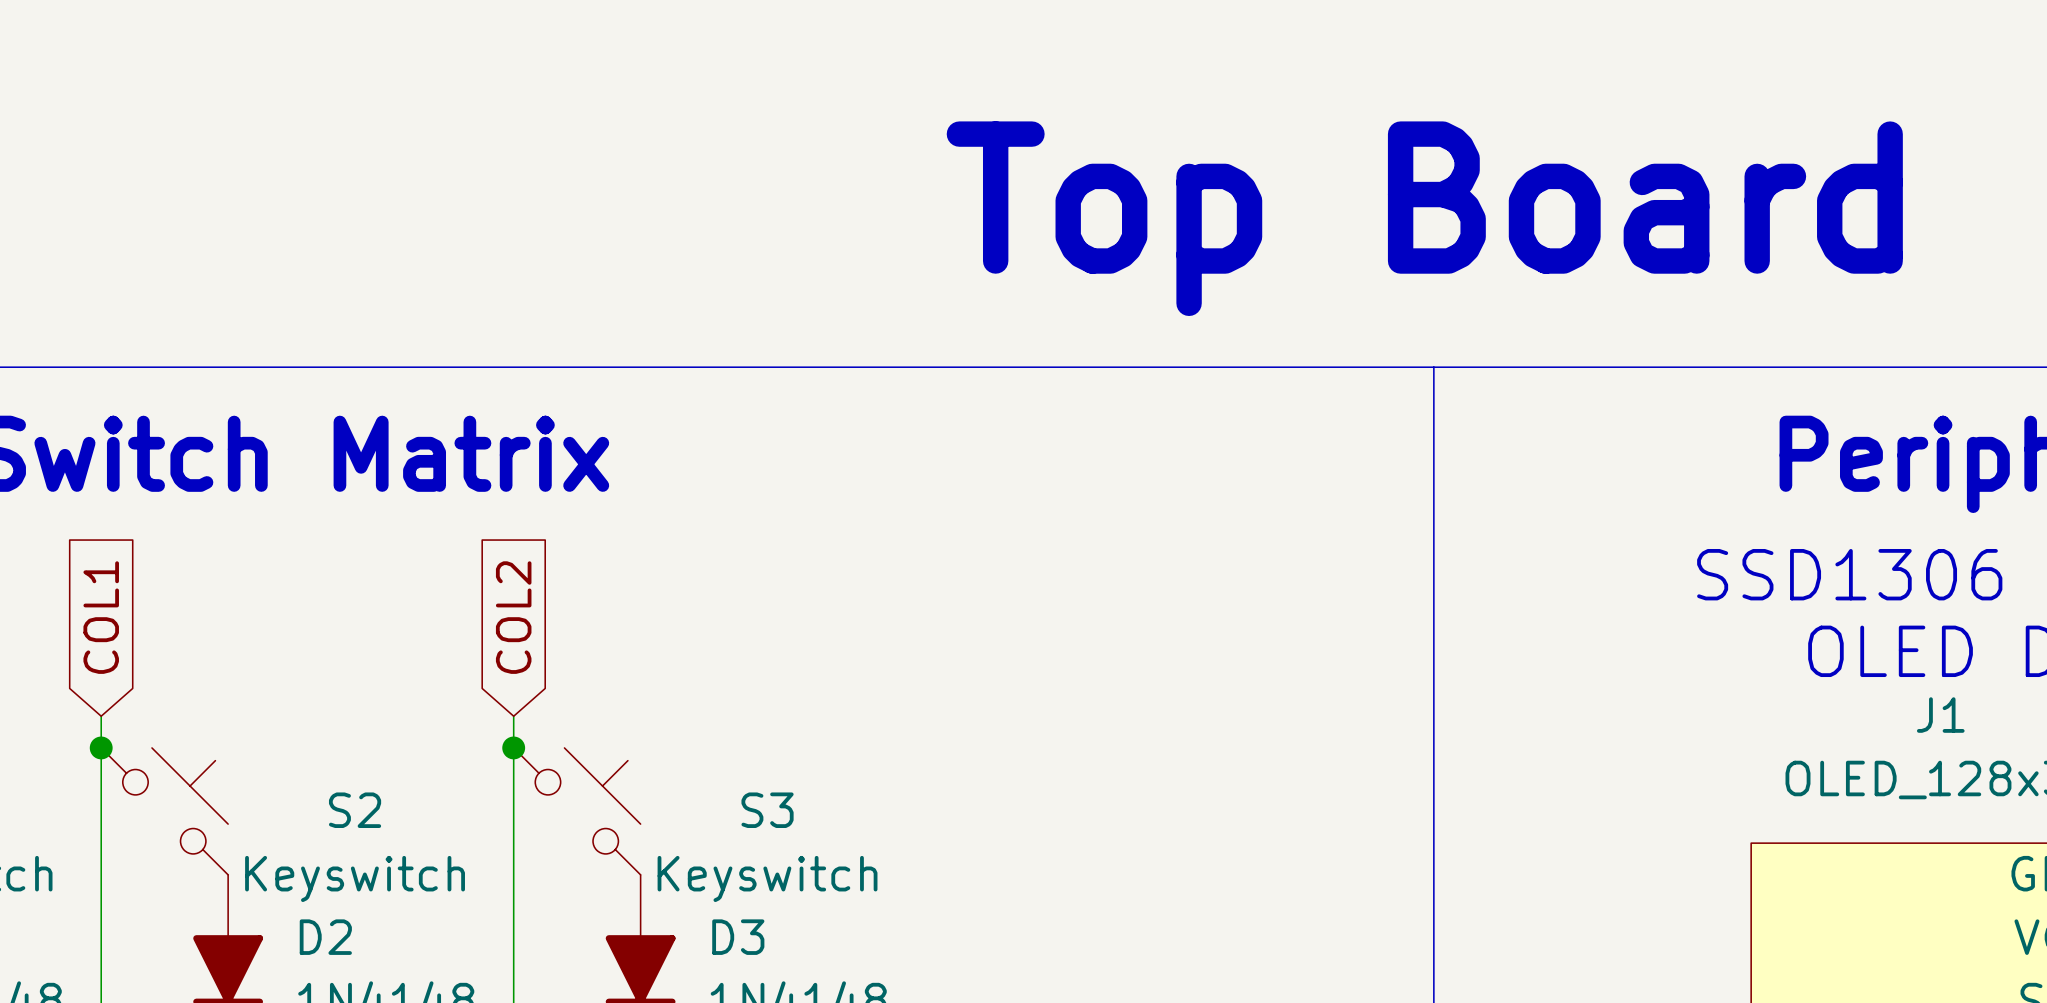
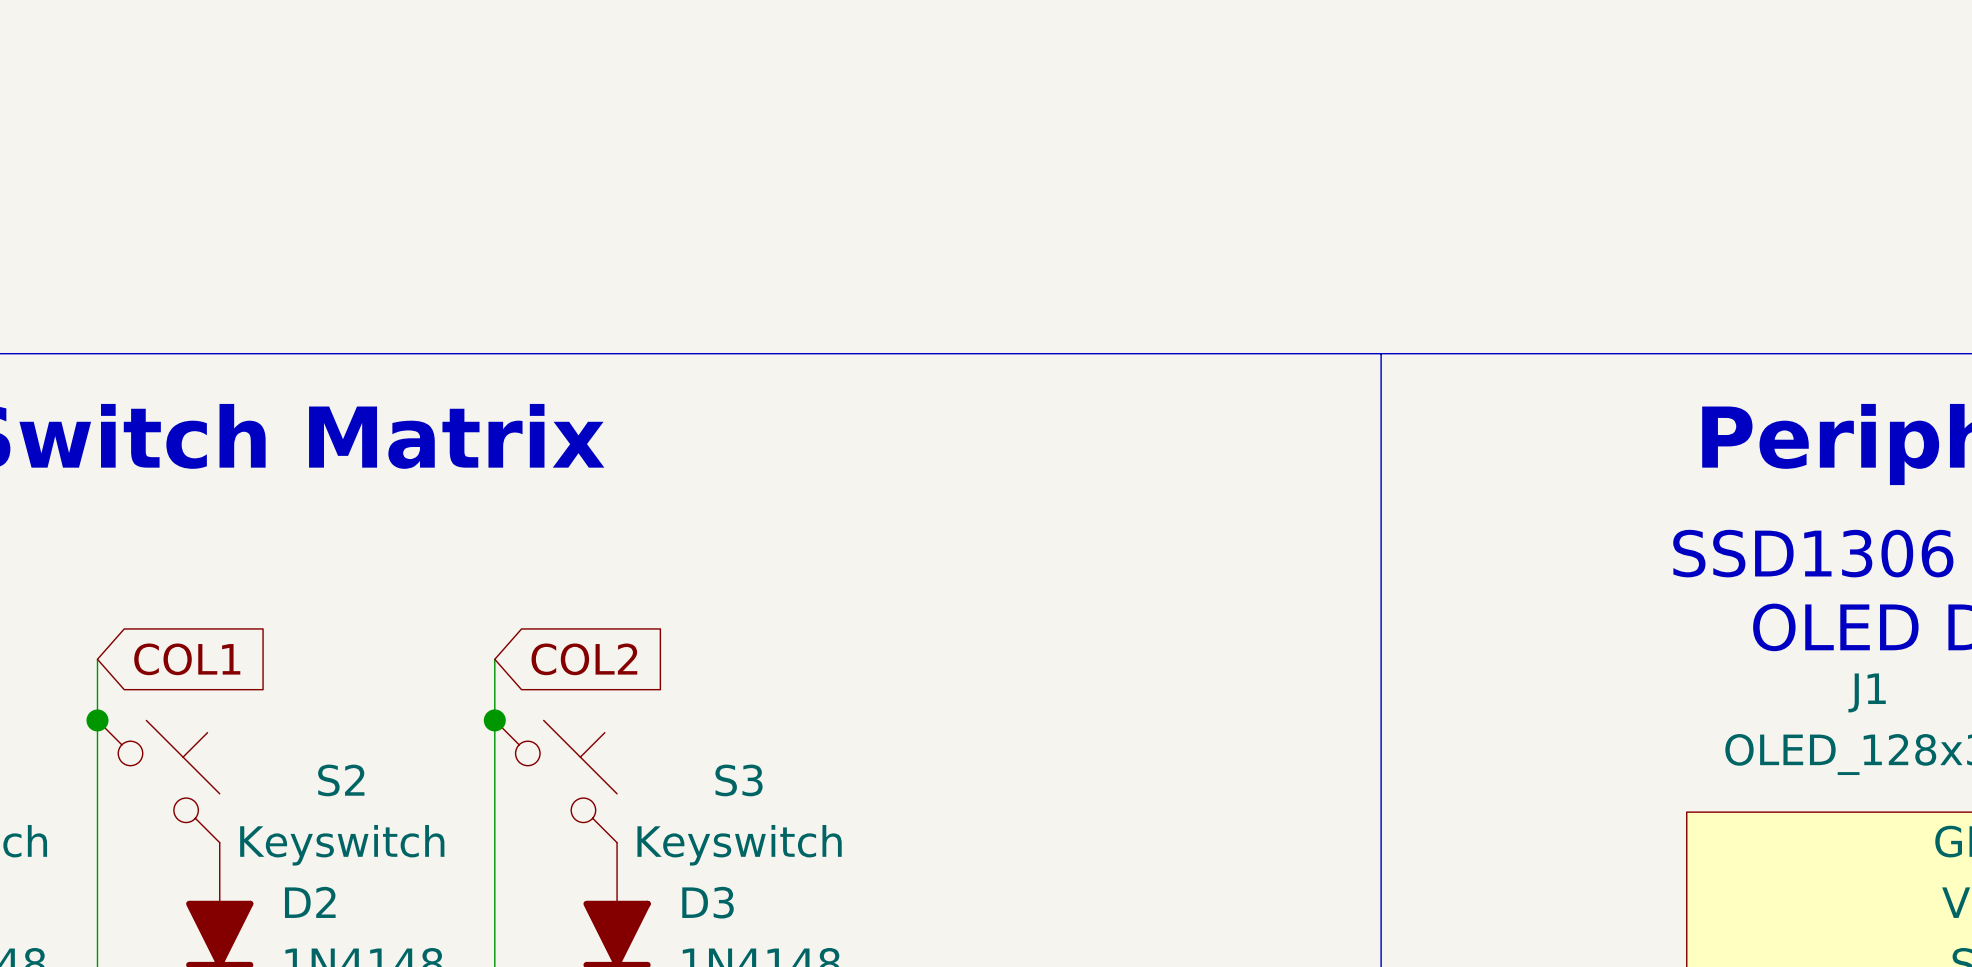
text: Top Board (1424, 218) -> none
global label rotation: 0° (101, 617) -> 90° clockwise (187, 659)
global label rotation: 0° (513, 617) -> 90° clockwise (584, 659)
wire: none -> (97, 659) (97, 689)
wire: none -> (494, 659) (494, 689)

